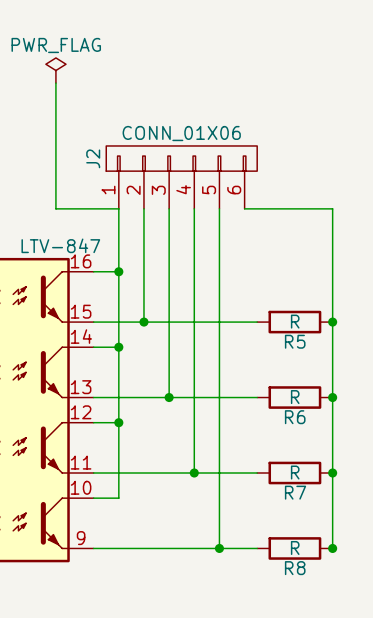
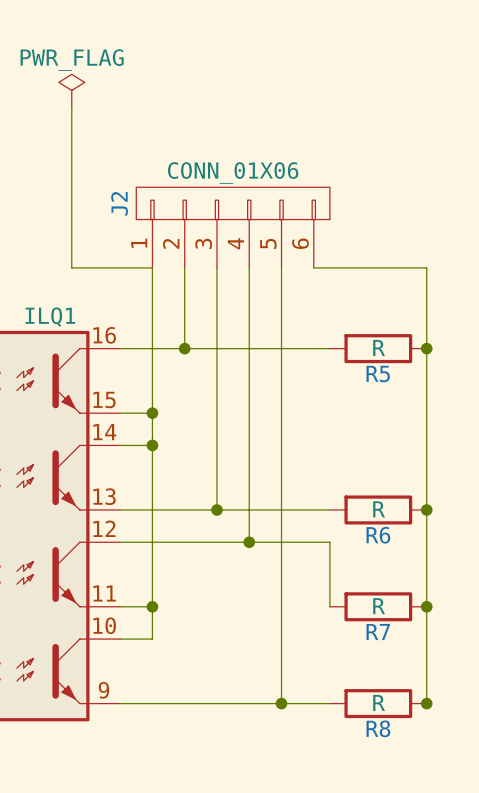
part value: LTV-847 (60, 245) -> ILQ1 (50, 317)
junction: (118, 271) -> none
wire: (143, 271) (143, 322) -> none
junction: none -> (184, 348)
wire: (118, 322) (257, 322) -> (152, 348) (329, 348)
junction: none -> (152, 413)
junction: (143, 322) -> none
R5 position: (294, 322) -> (378, 348)
junction position: (332, 322) -> (426, 348)
junction: (118, 422) -> none
wire: (194, 422) (194, 473) -> none
junction: none -> (249, 542)
wire: (118, 473) (257, 473) -> (152, 542) (329, 542) (329, 606)
junction: none -> (152, 606)
junction: (194, 473) -> none

